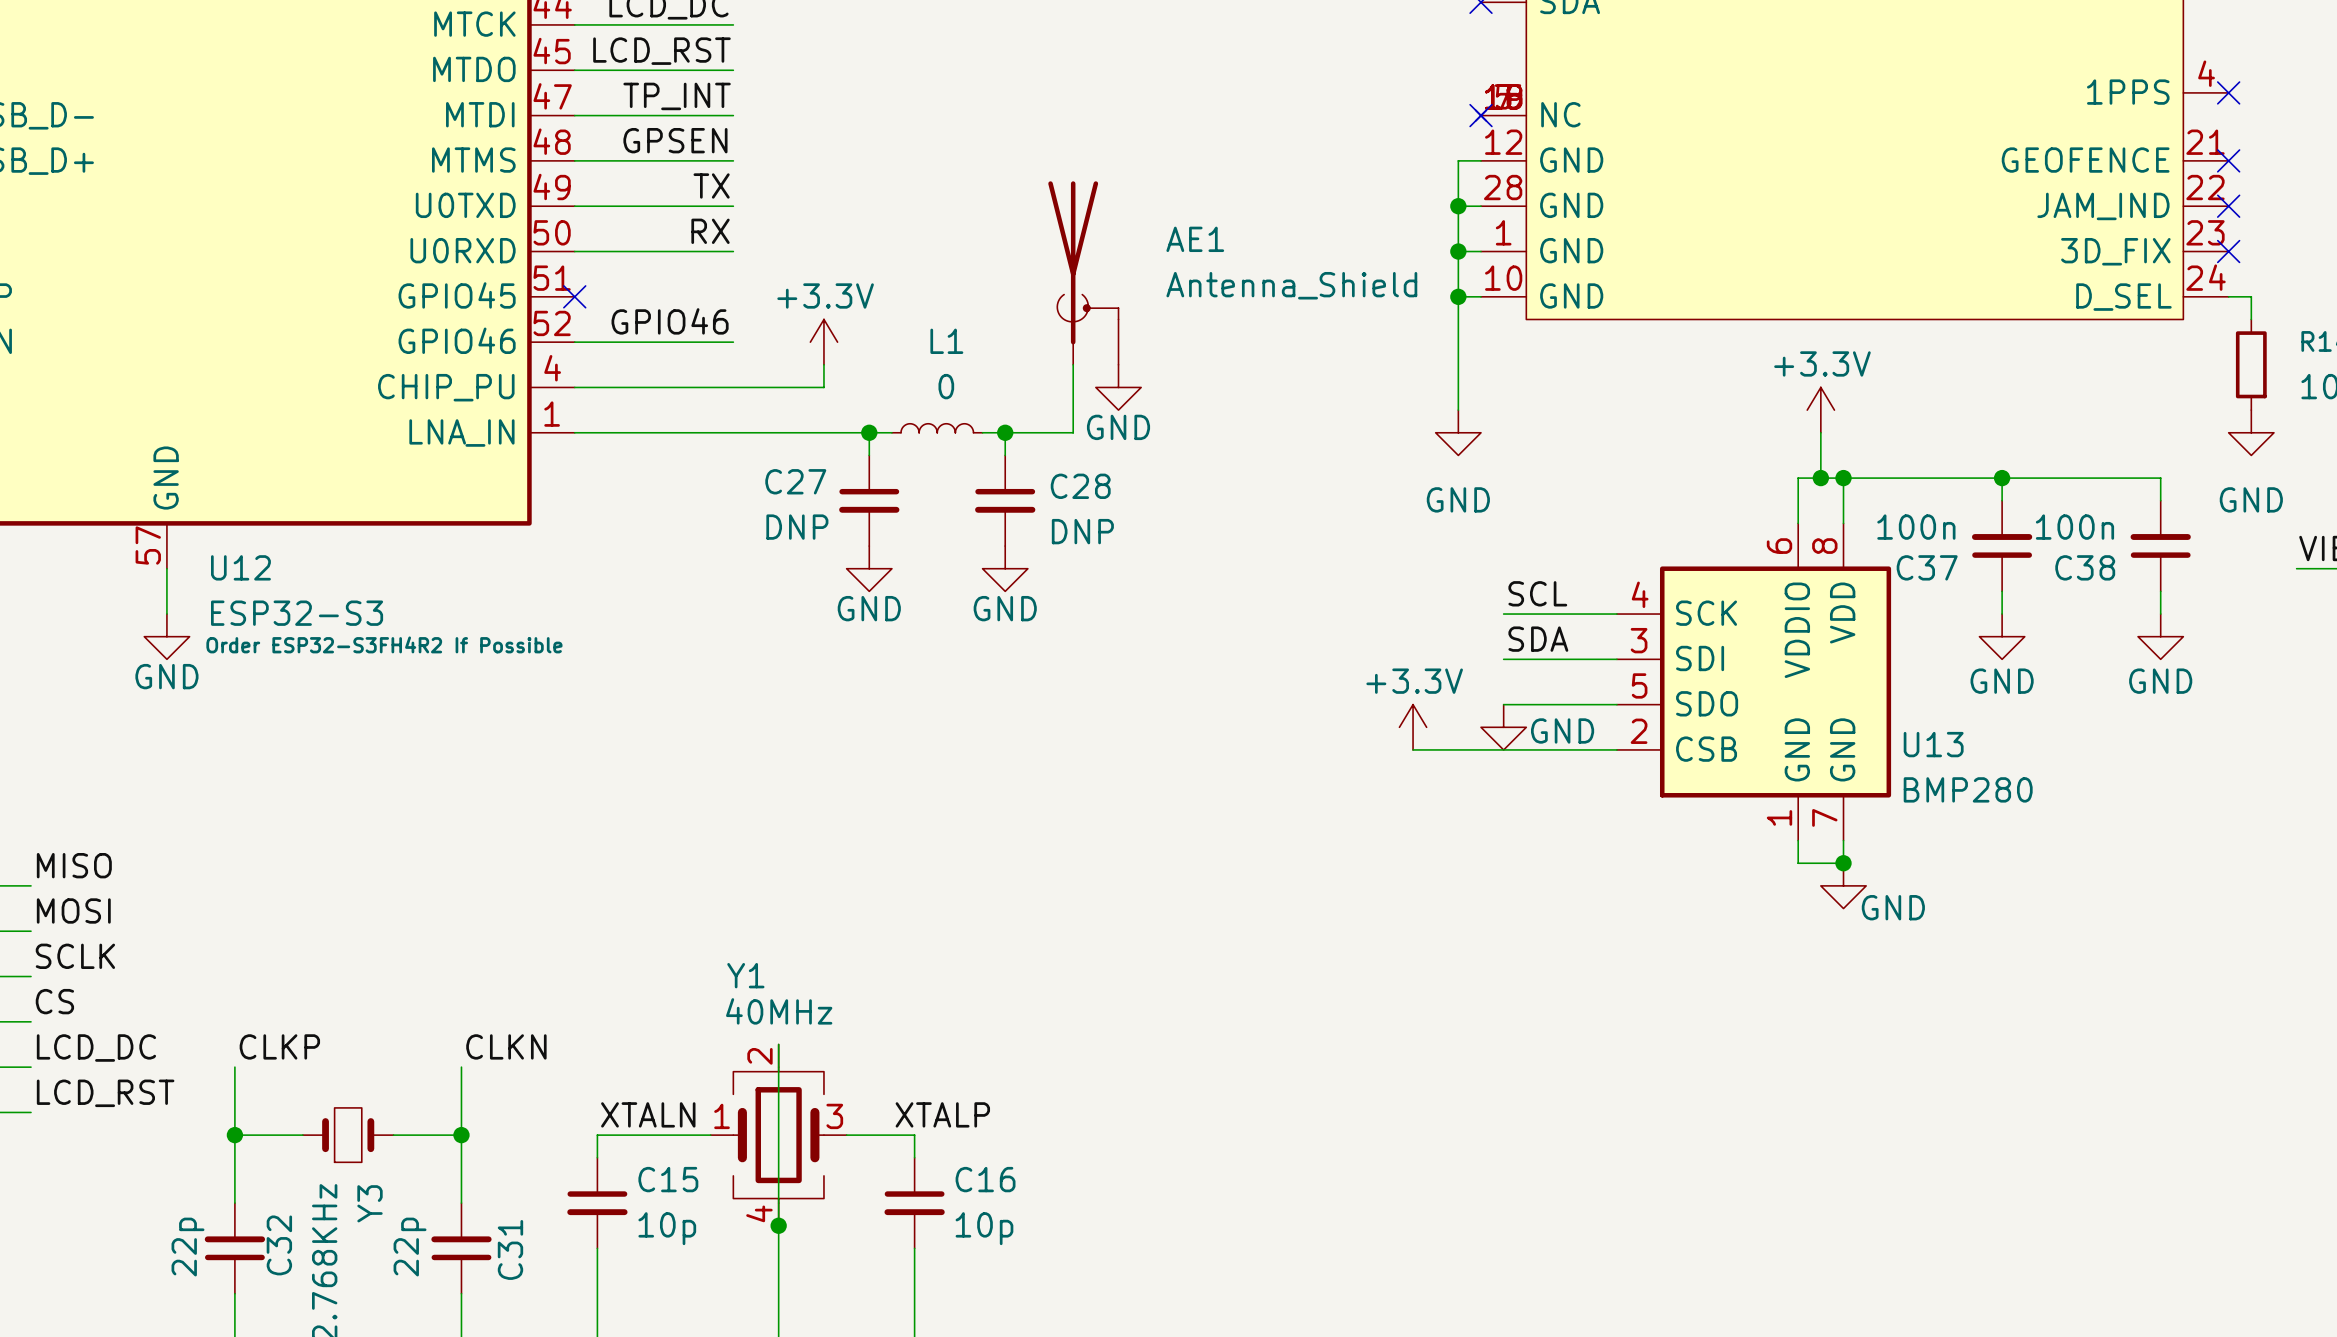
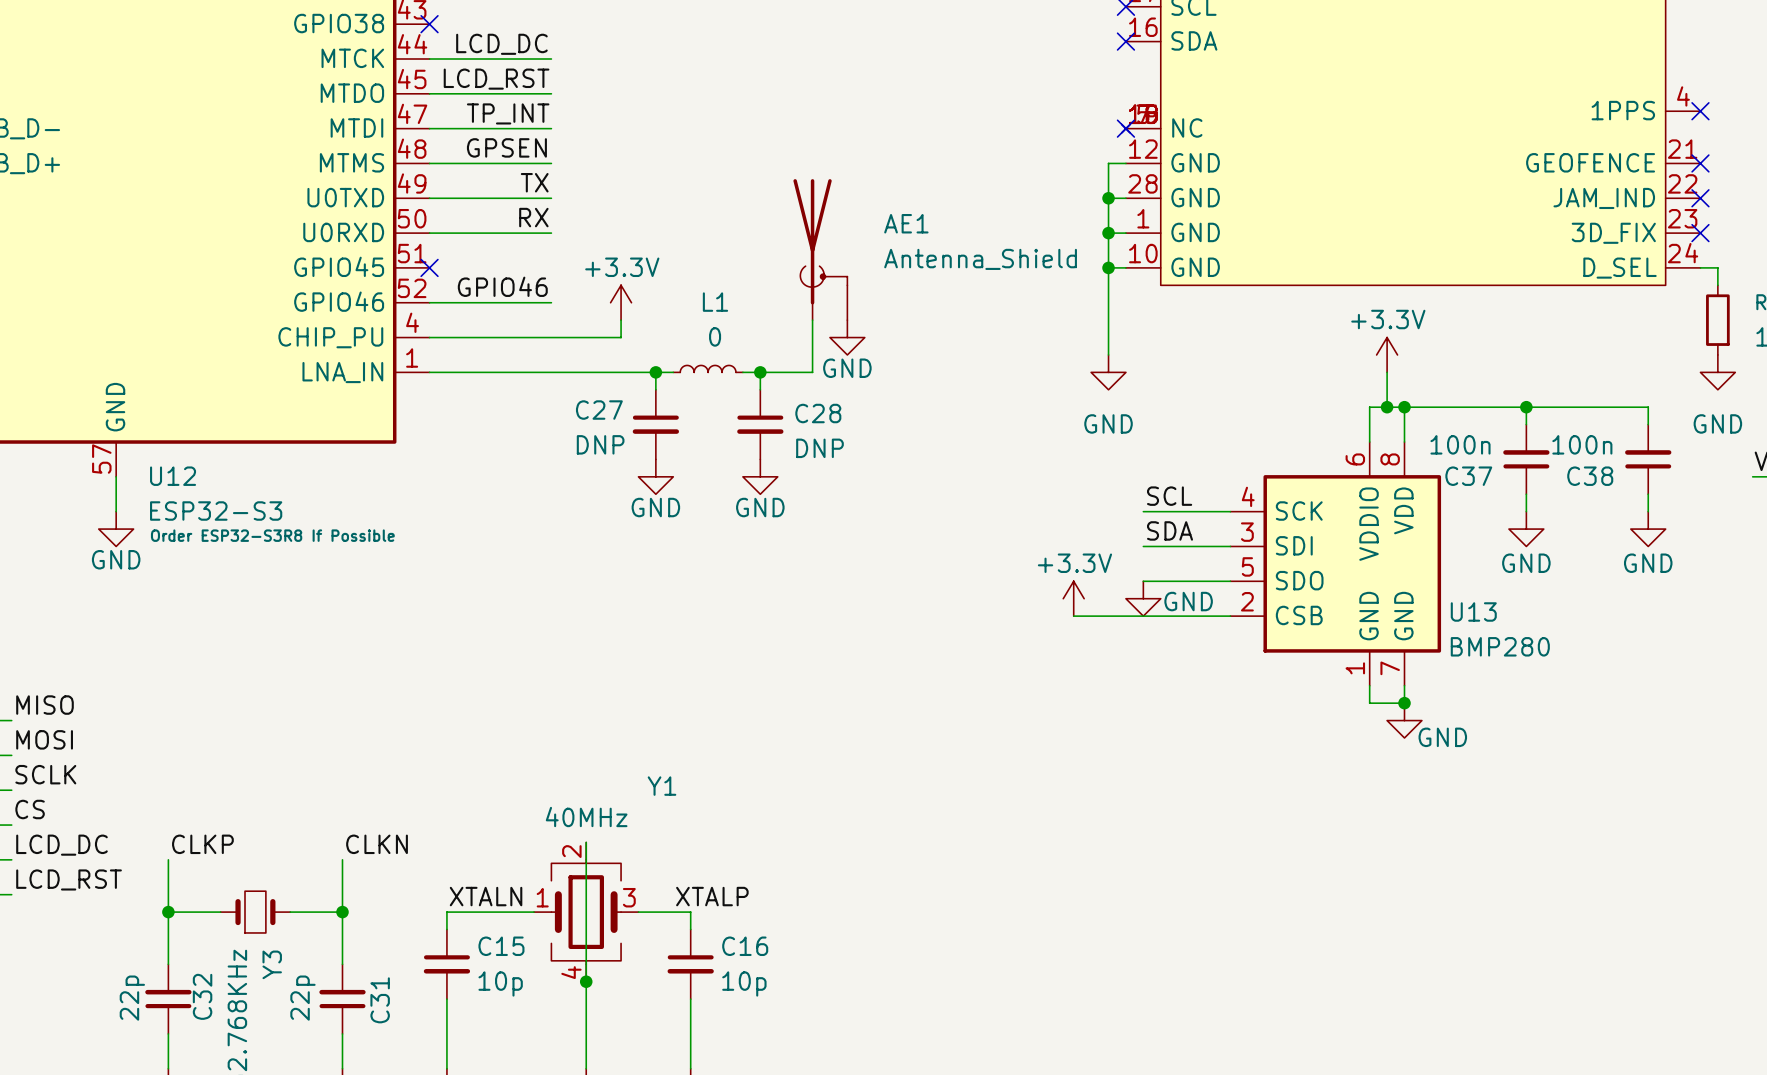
U12 text: Order ESP32-S3FH4R2 If Possible (384, 644) -> Order ESP32-S3R8 If Possible (272, 535)
Y1 name position: Y1 (745, 975) -> Y1 (662, 786)

